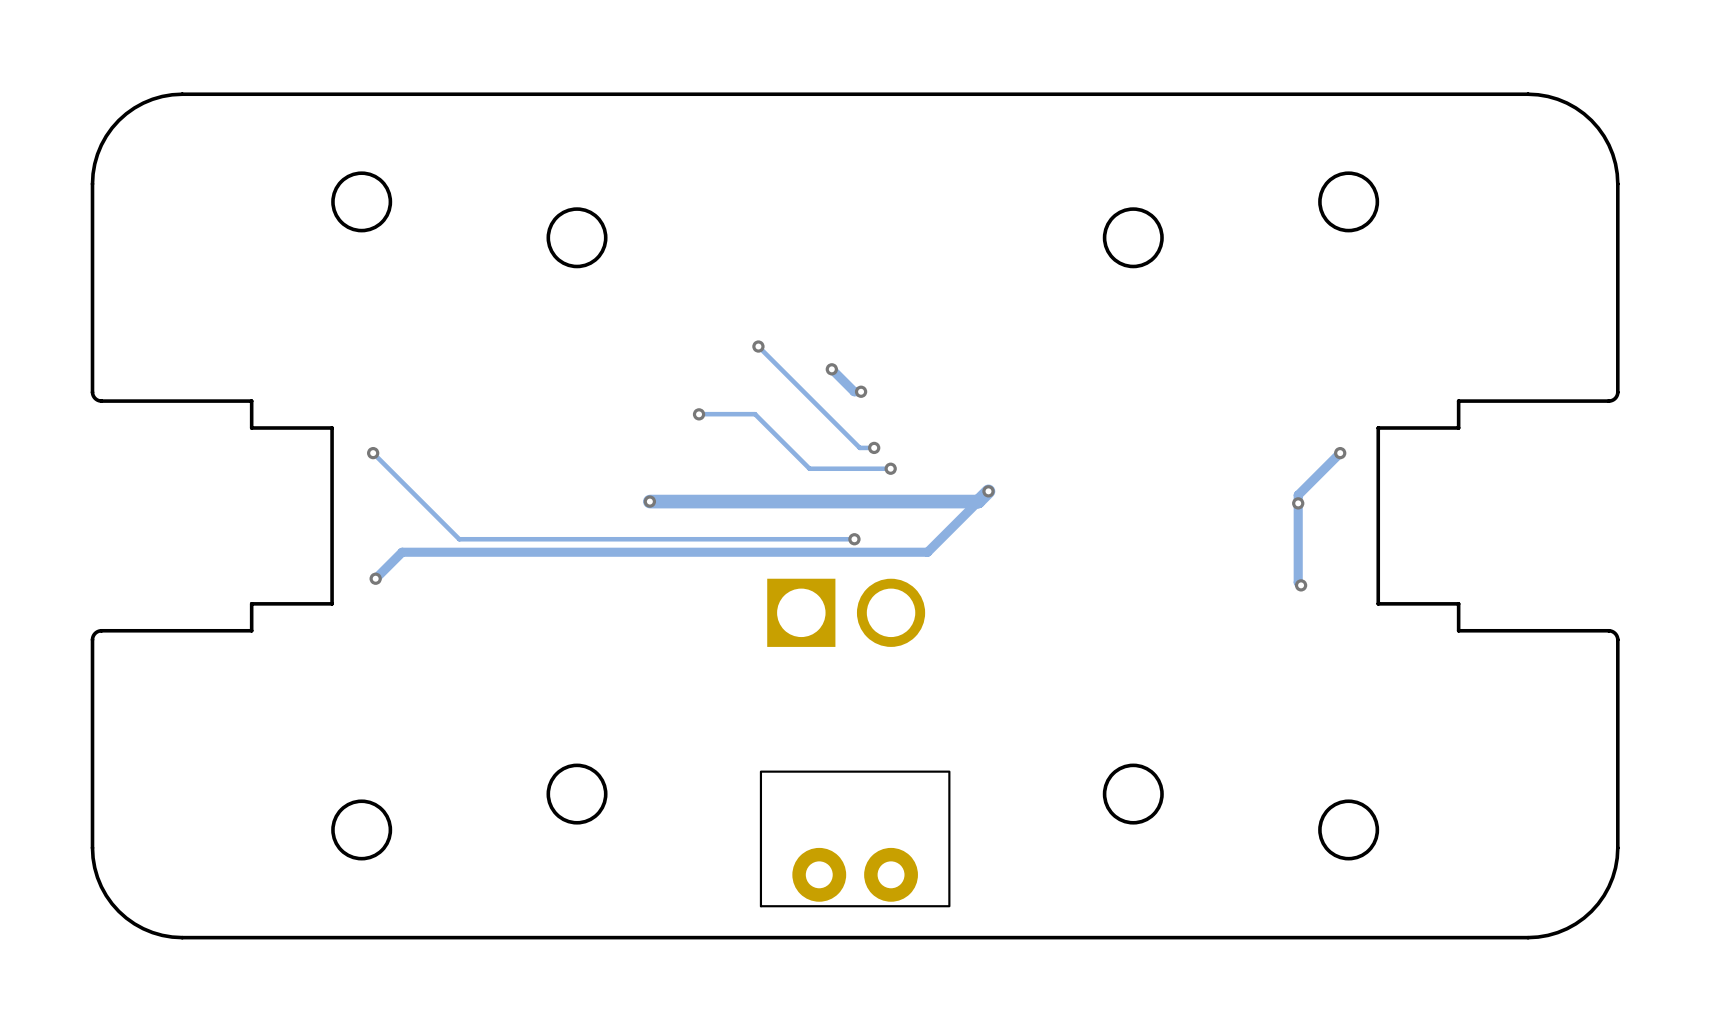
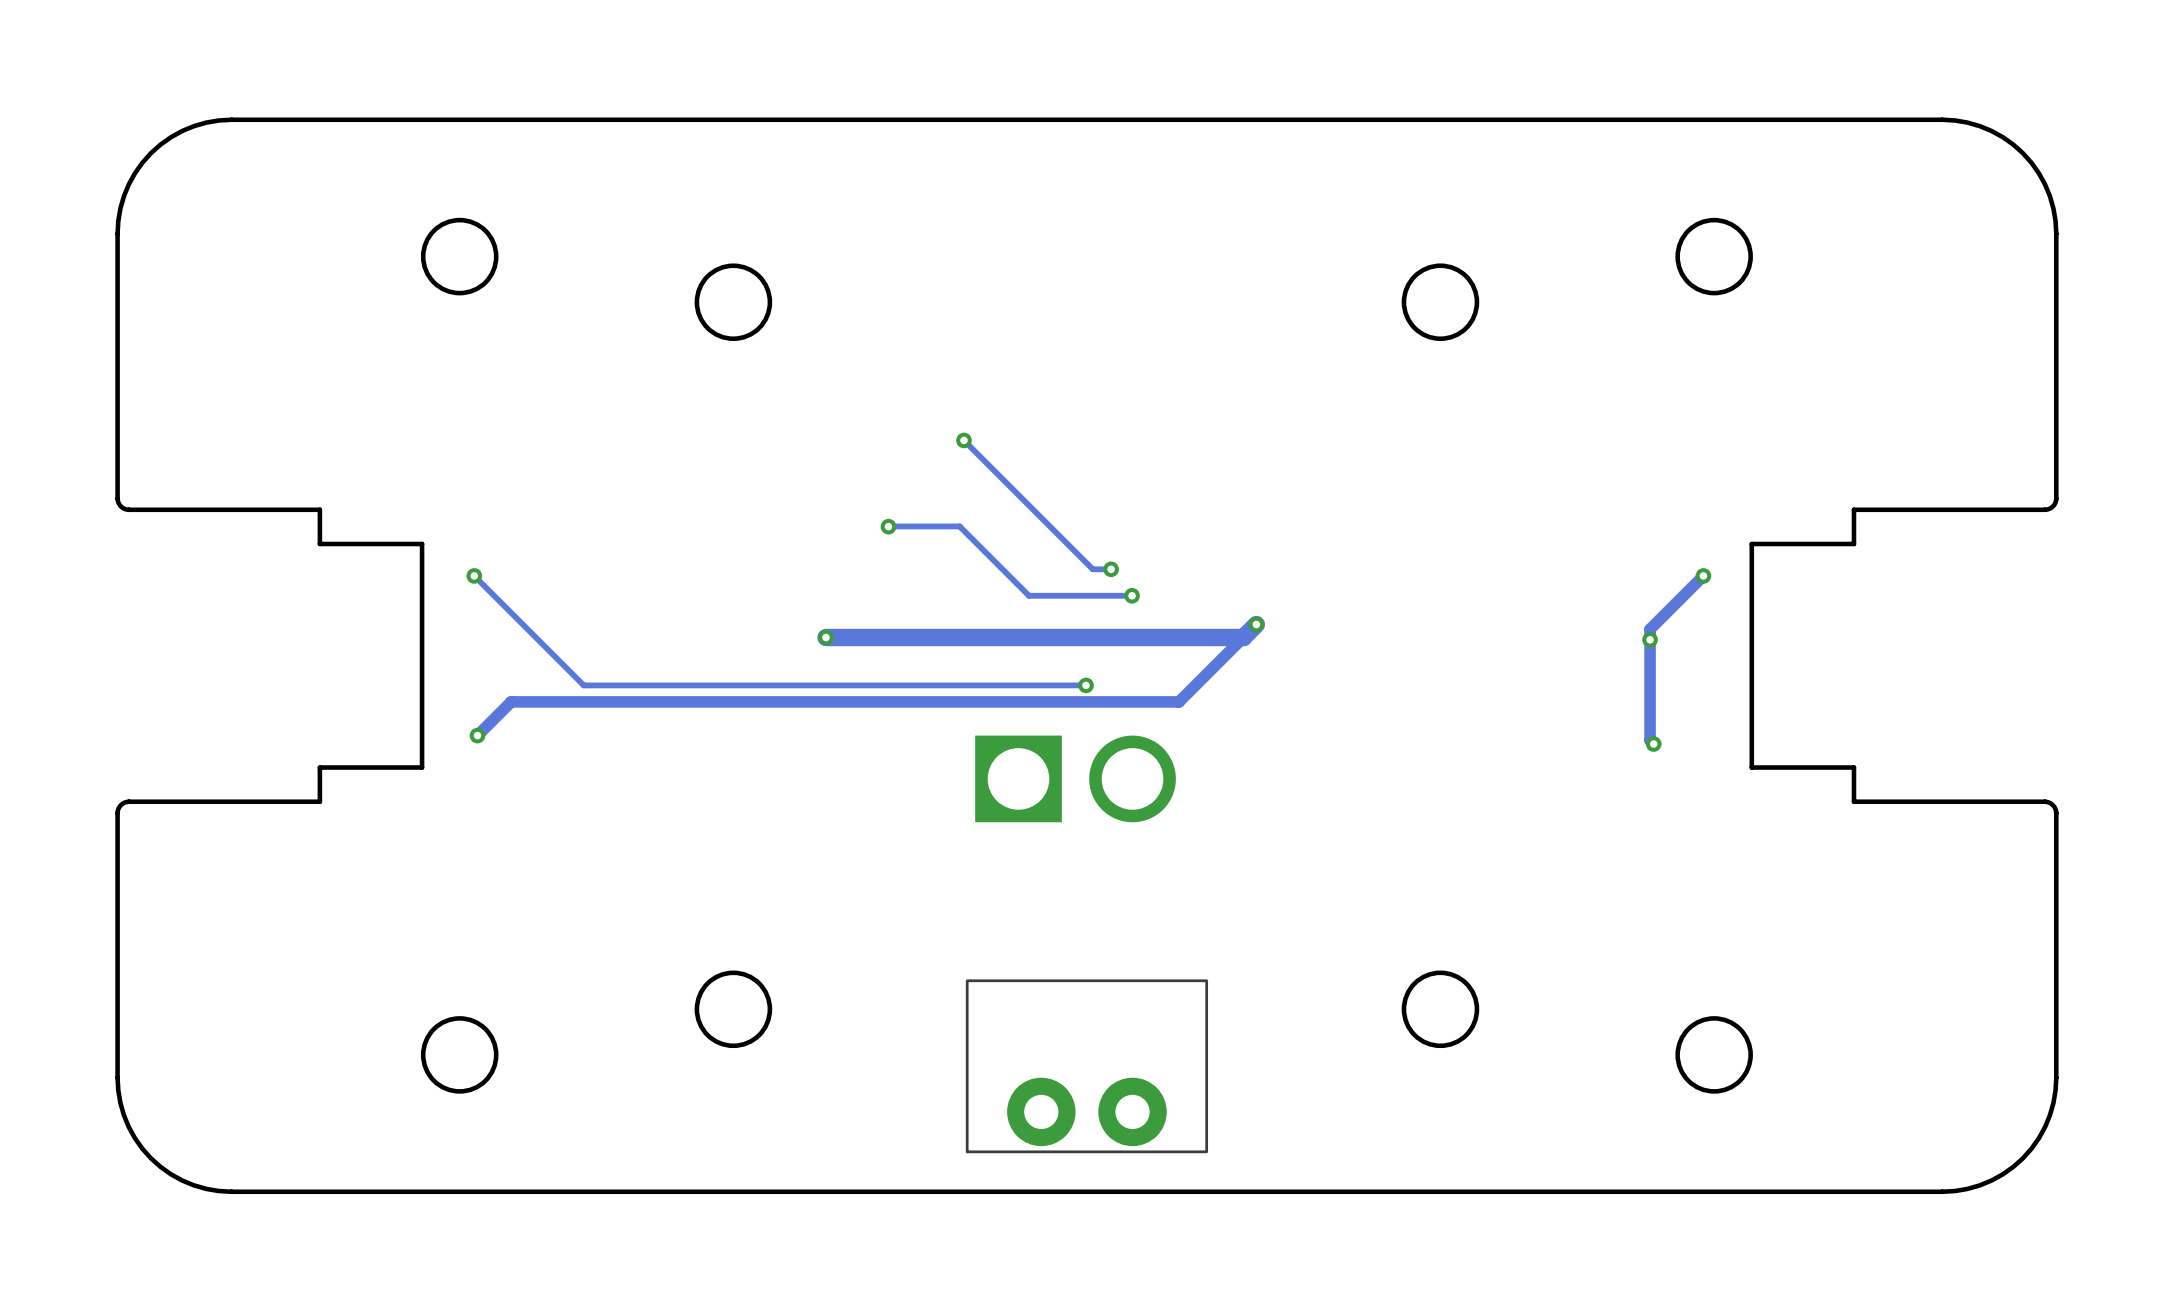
track: (831, 369) (854, 391) (861, 391) -> none
via: (831, 369) -> none
via: (861, 391) -> none

